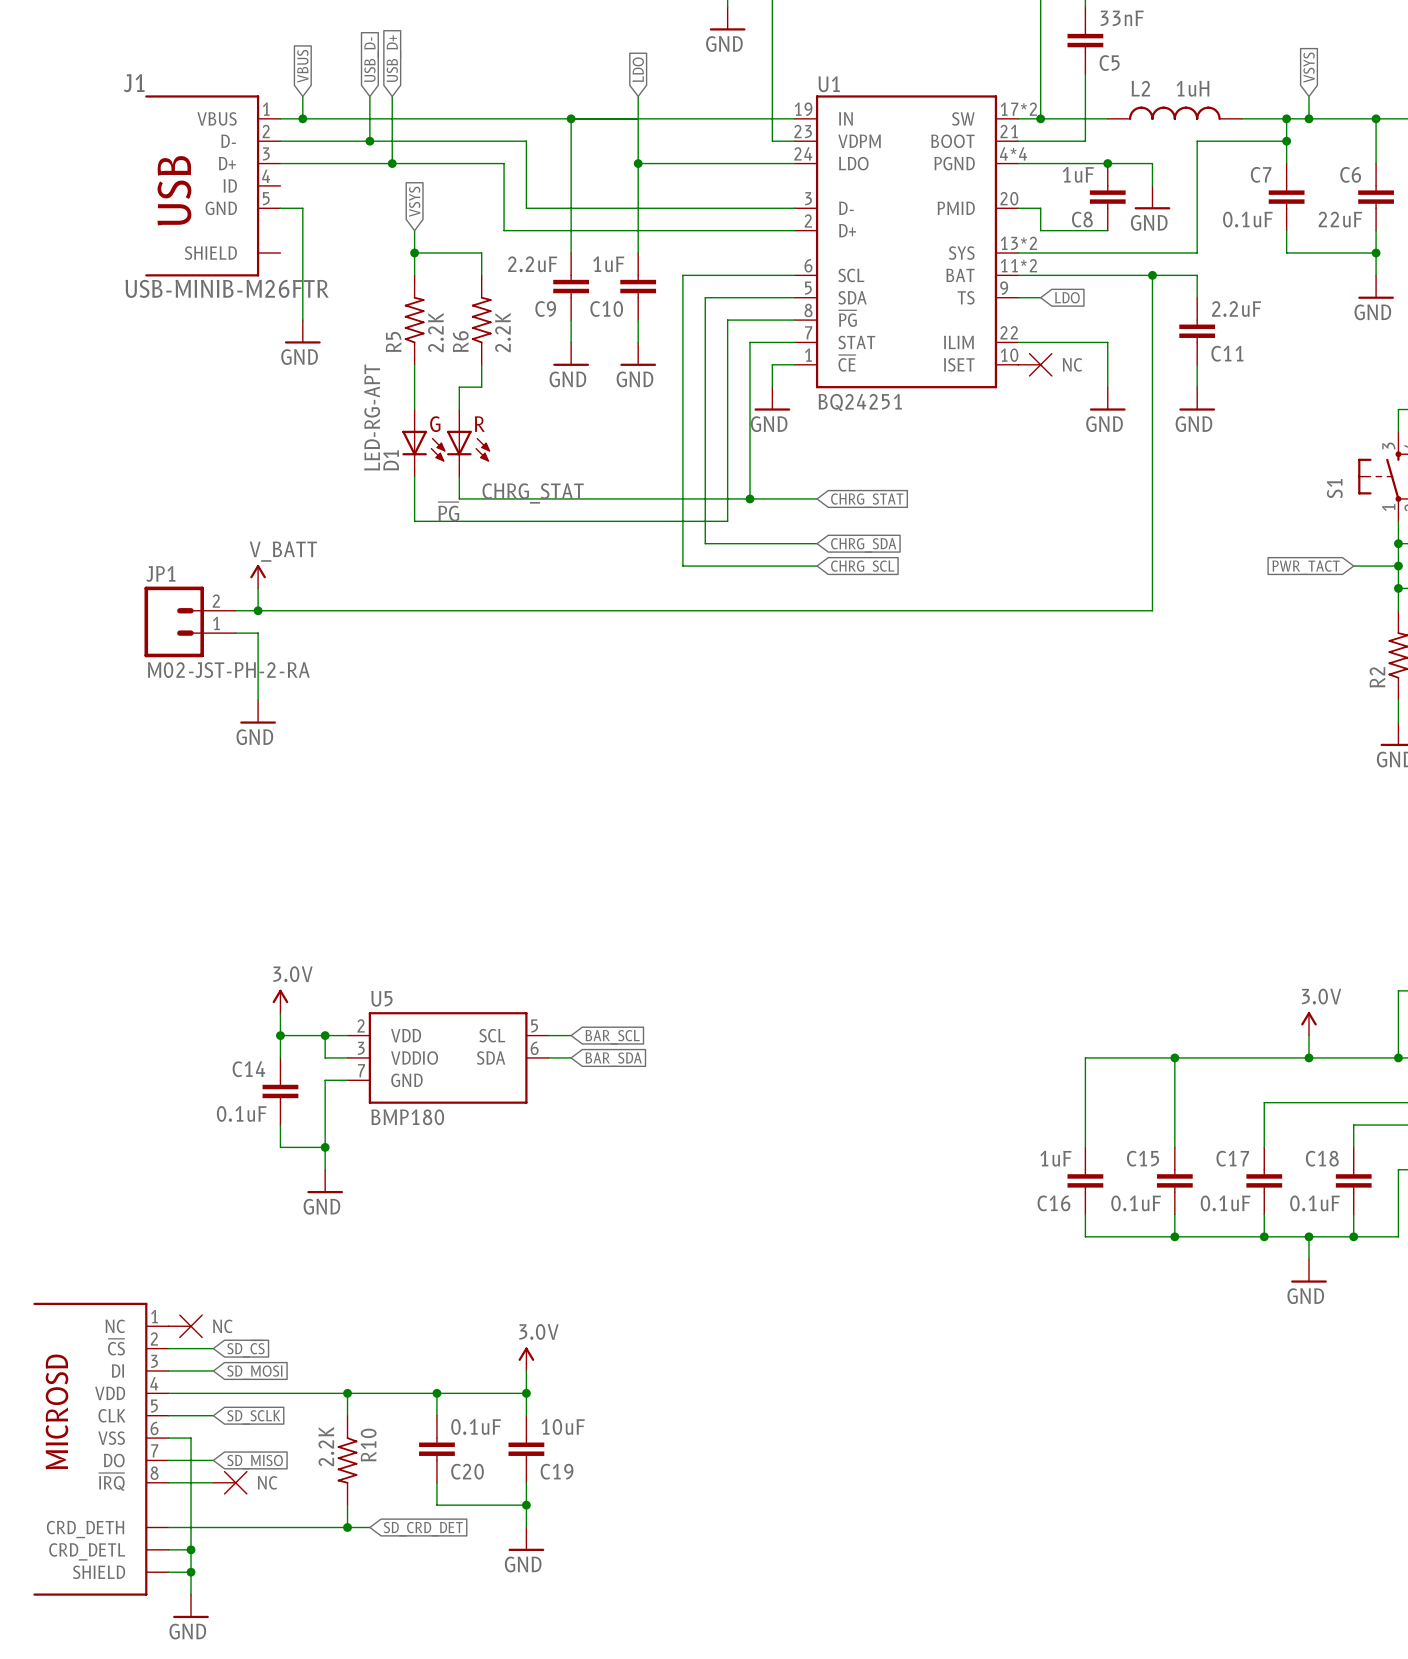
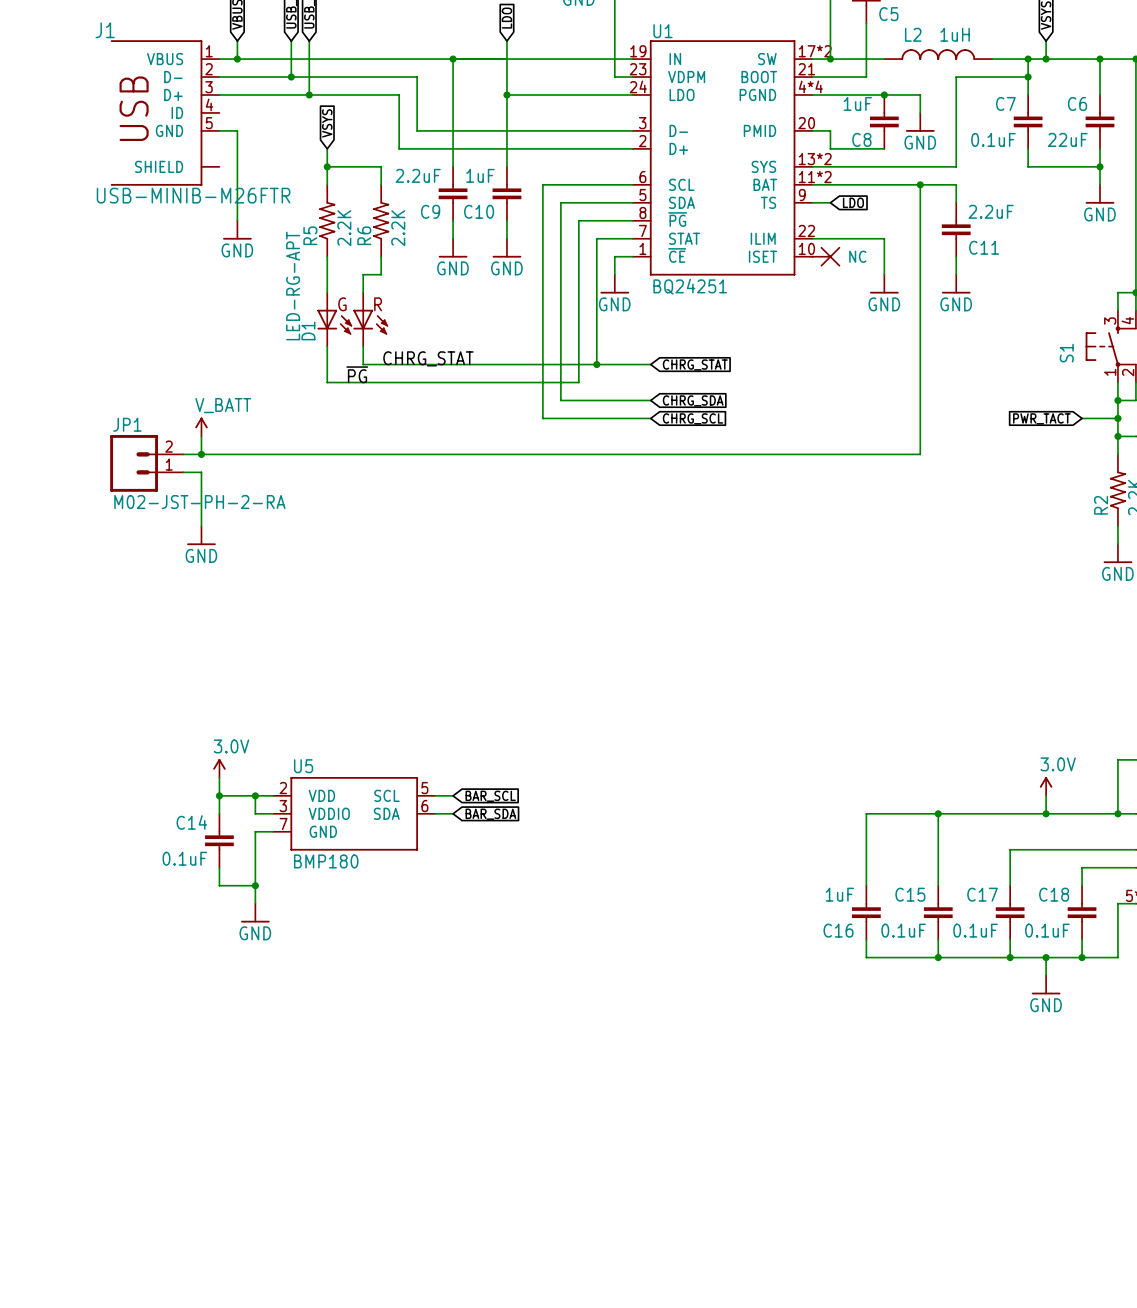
part: (185, 1326) -> none
wire: (168, 1348) (213, 1348) -> none
global label: SD_~{CS} (245, 1349) -> none
power symbol: 3.0V (526, 1359) -> none
wire: (168, 1370) (213, 1370) -> none
wire: (526, 1370) (526, 1415) -> none
global label: SD_MOSI (254, 1372) -> none
wire: (168, 1393) (526, 1393) -> none
wire: (347, 1393) (347, 1415) -> none
junction: (347, 1393) -> none
wire: (436, 1393) (436, 1415) -> none
junction: (436, 1393) -> none
junction: (526, 1393) -> none
wire: (168, 1415) (213, 1415) -> none
global label: SD_SCLK (253, 1417) -> none
wire: (168, 1438) (191, 1438) (191, 1594) -> none
part: (101, 1449) -> none
C20: 0.1uF (436, 1449) -> none
C19: 10uF (526, 1449) -> none
wire: (168, 1460) (213, 1460) -> none
R10: 2.2K (347, 1460) -> none
global label: SD_MISO (255, 1462) -> none
wire: (168, 1482) (213, 1482) -> none
part: (230, 1482) -> none
wire: (436, 1482) (436, 1505) (526, 1505) -> none
wire: (526, 1482) (526, 1527) -> none
wire: (347, 1505) (347, 1527) -> none
junction: (526, 1505) -> none
wire: (168, 1527) (369, 1527) -> none
junction: (347, 1527) -> none
global label: SD_CRD_DET (423, 1529) -> none
power symbol: GND (526, 1539) -> none
wire: (168, 1549) (191, 1549) -> none
junction: (191, 1549) -> none
wire: (168, 1572) (191, 1572) -> none
junction: (191, 1572) -> none
power symbol: GND (191, 1606) -> none

